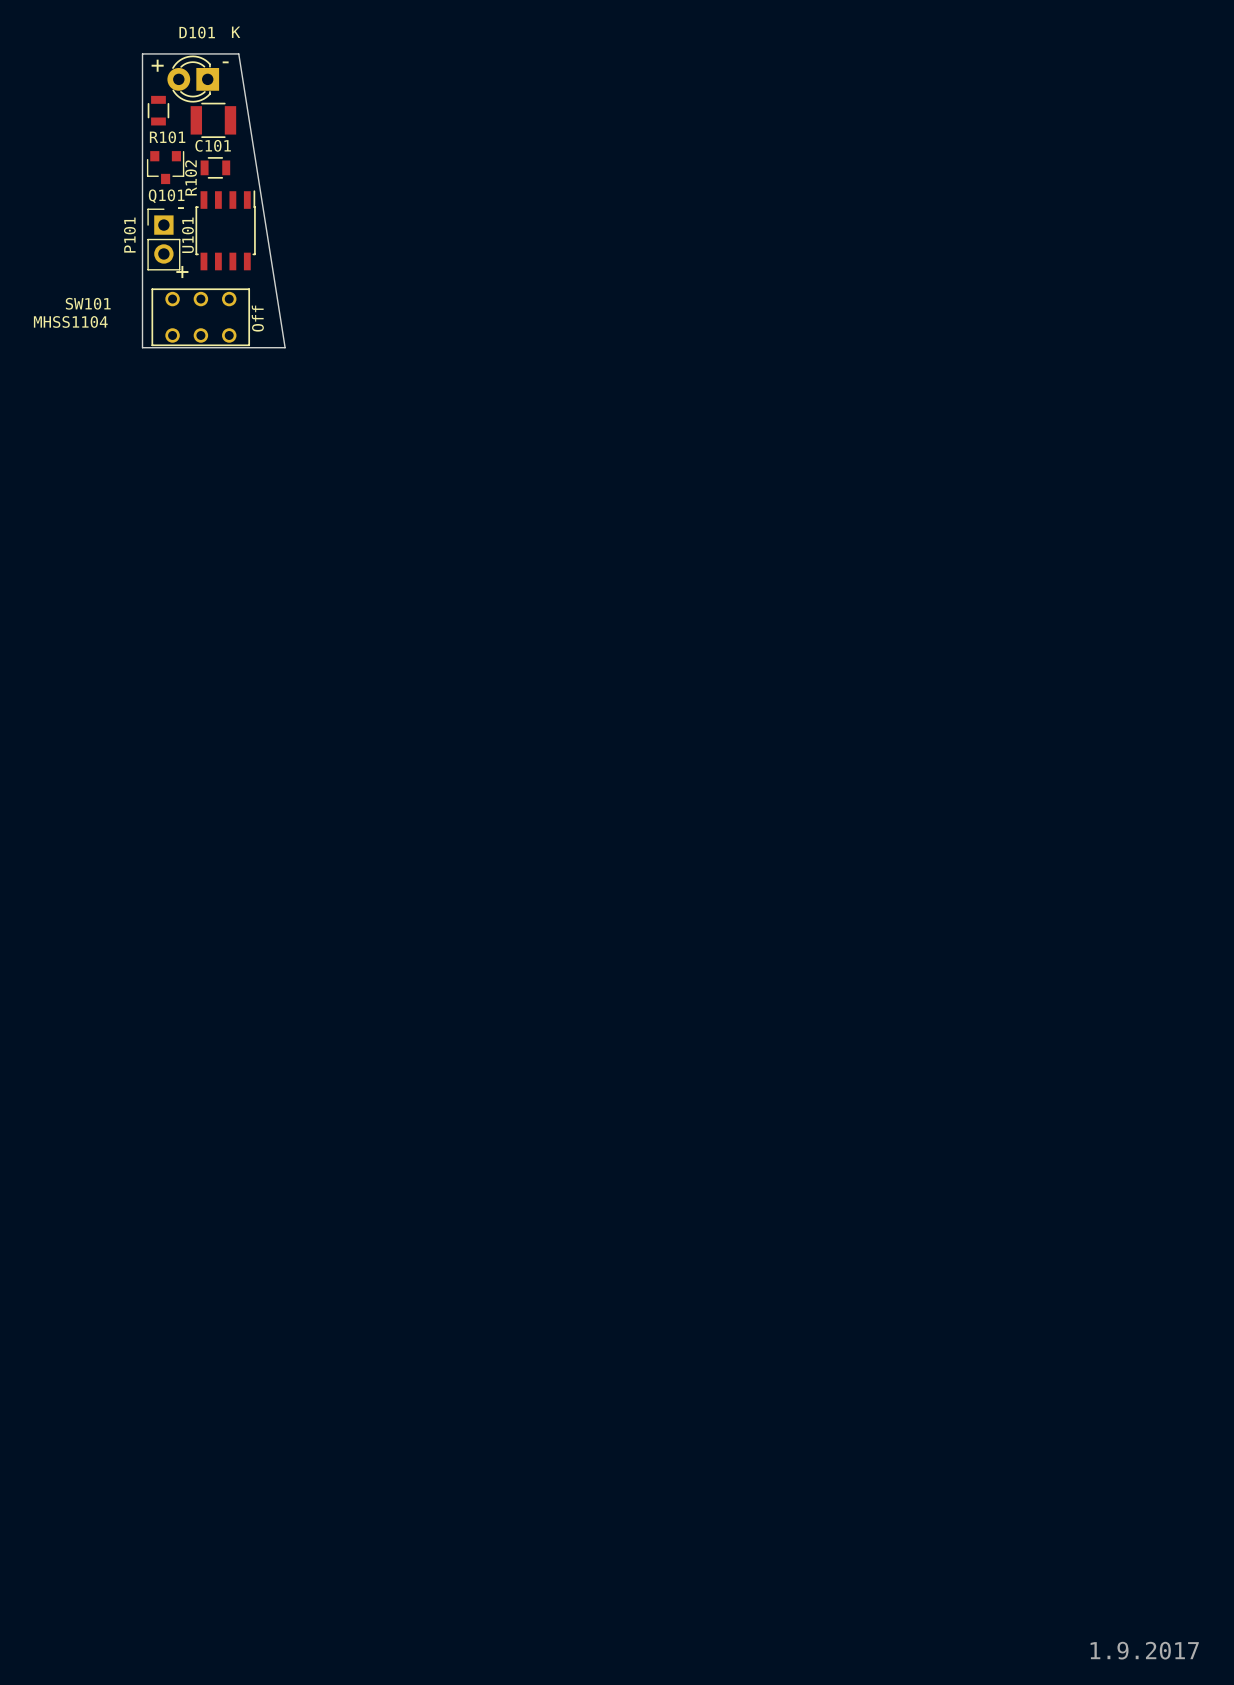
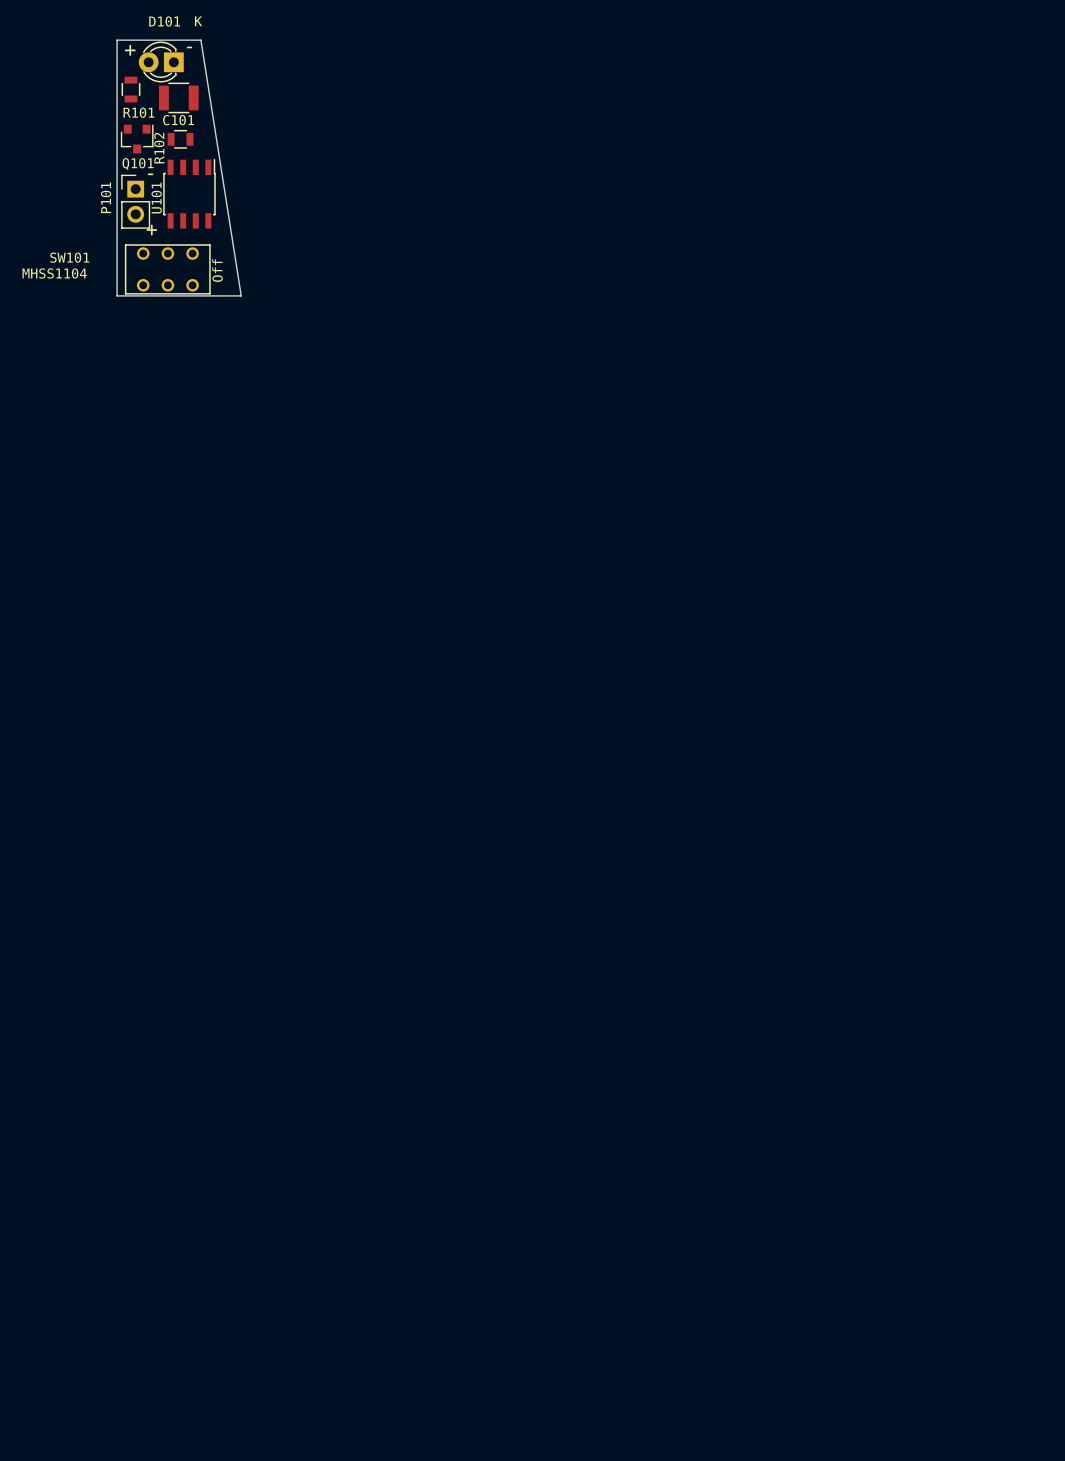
text: 1.9.2017 (1144, 1650) -> none

